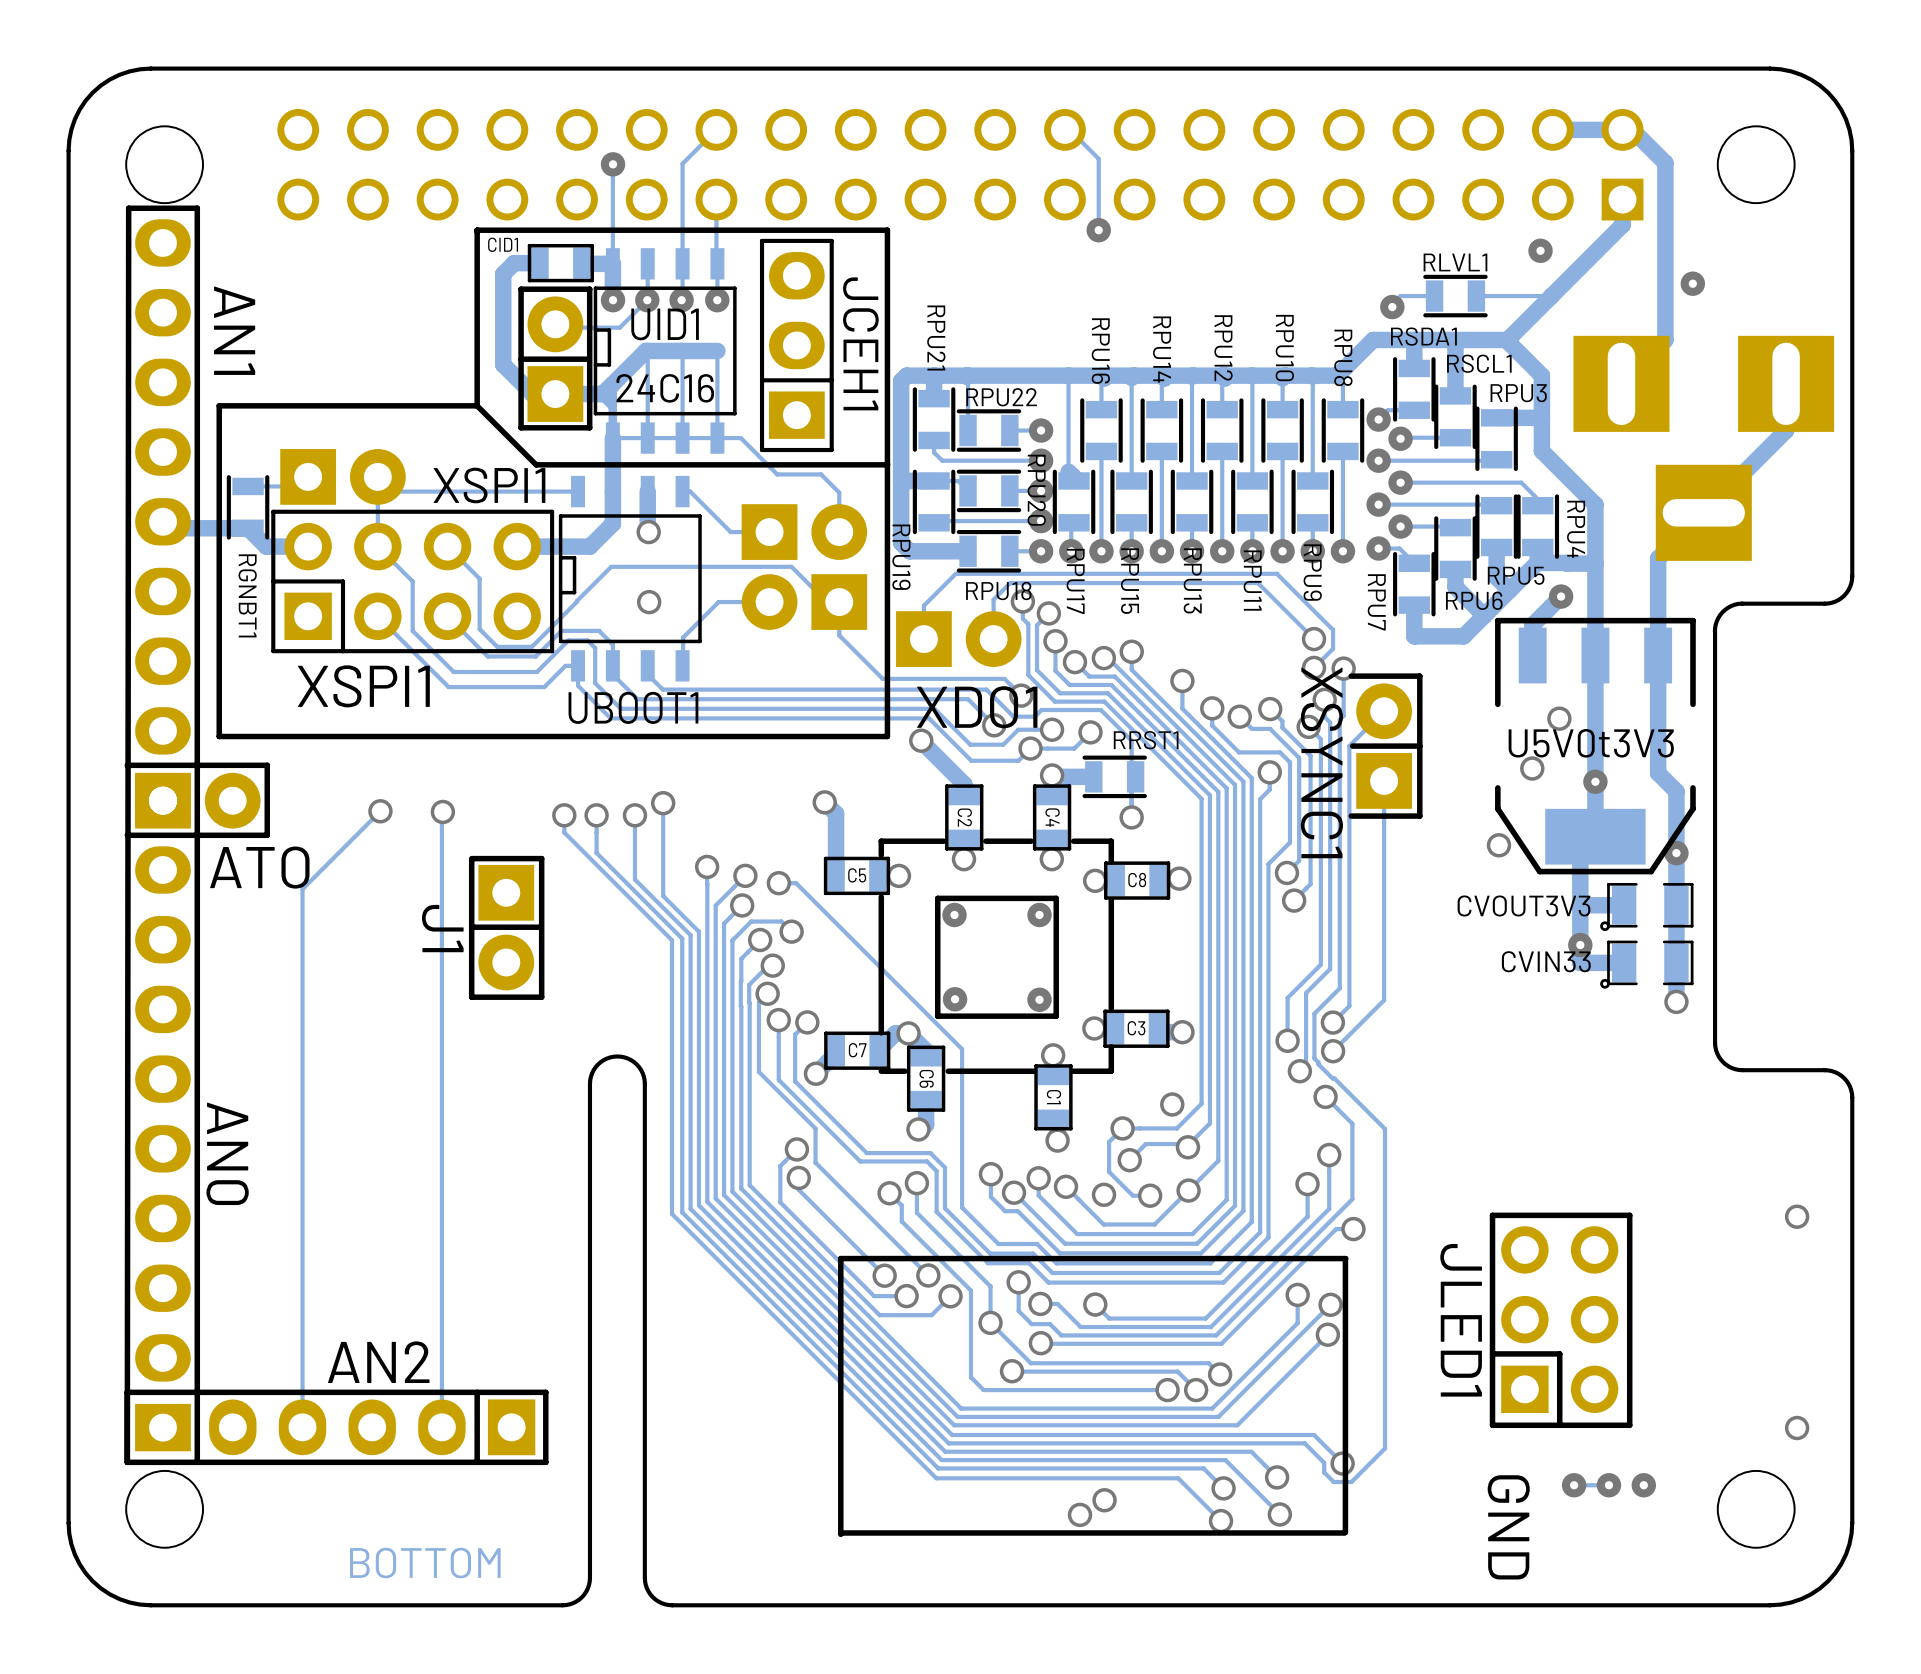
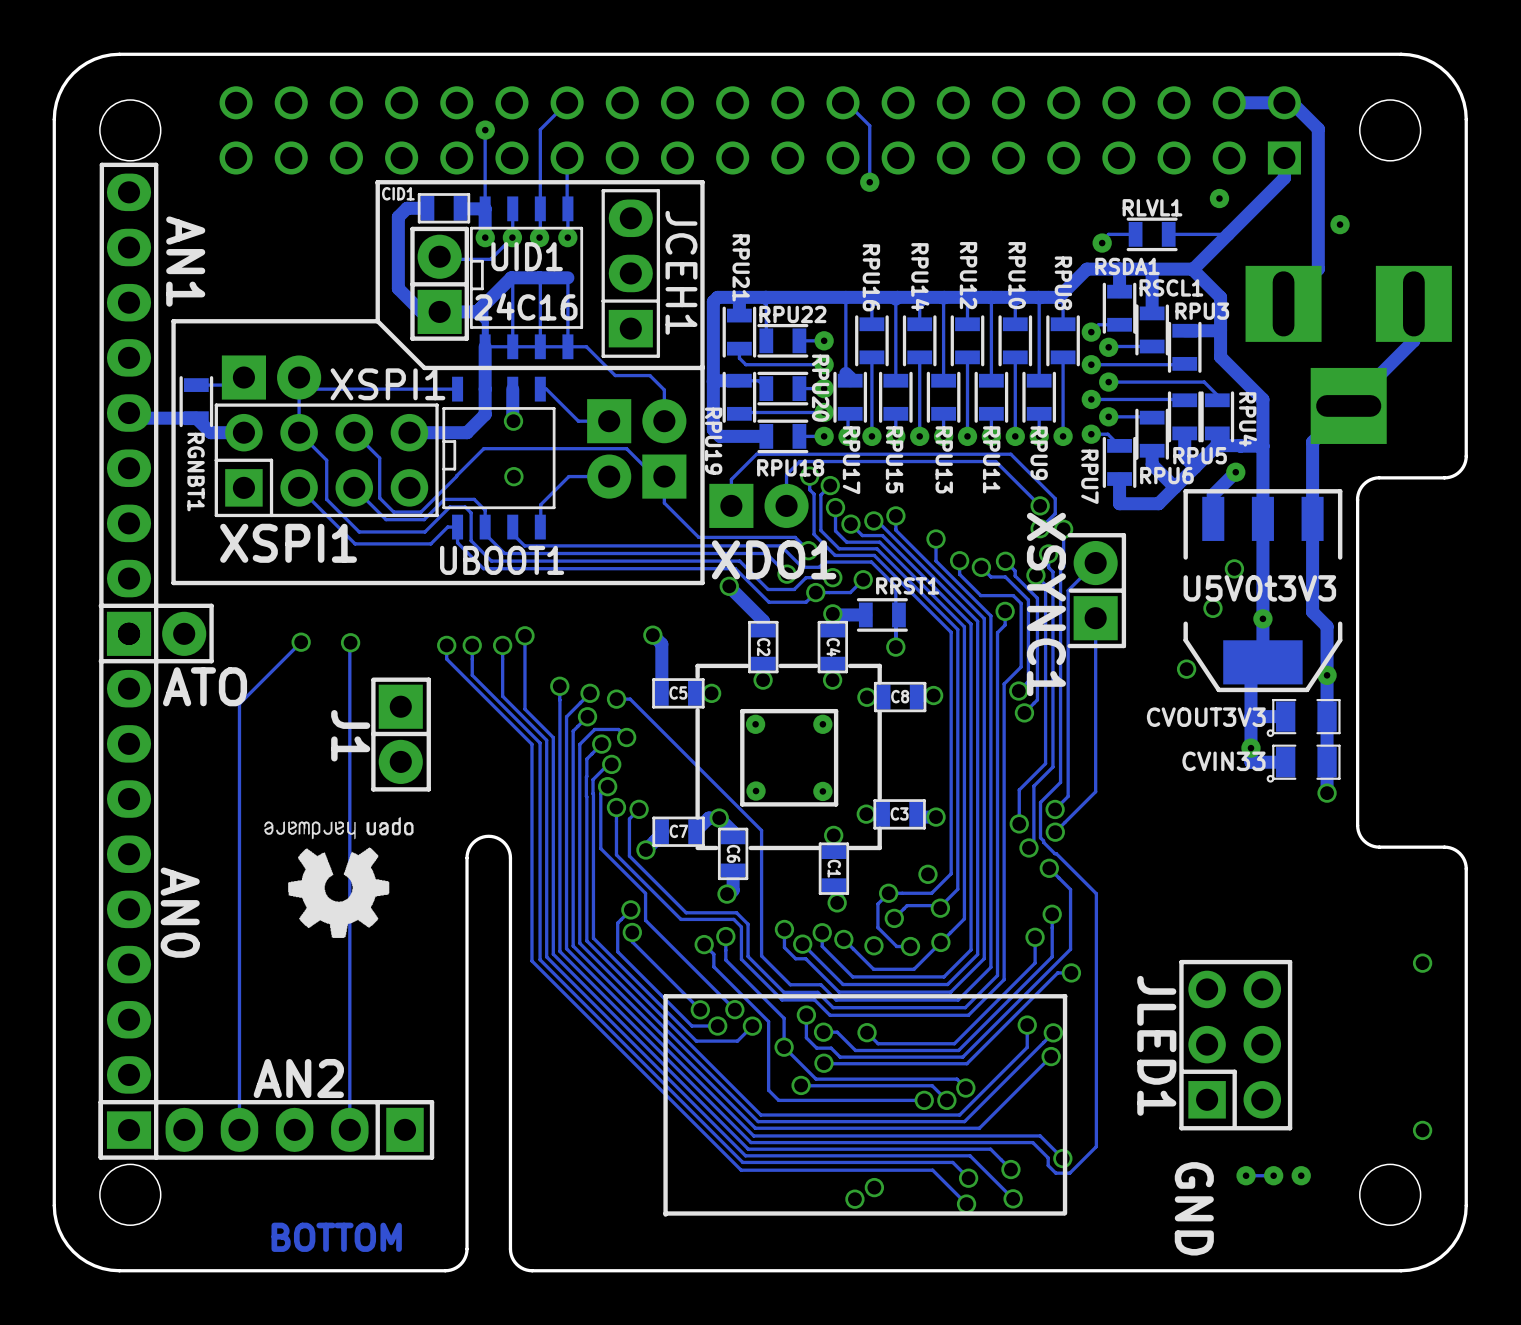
drawing: none -> [264, 817, 414, 938]

